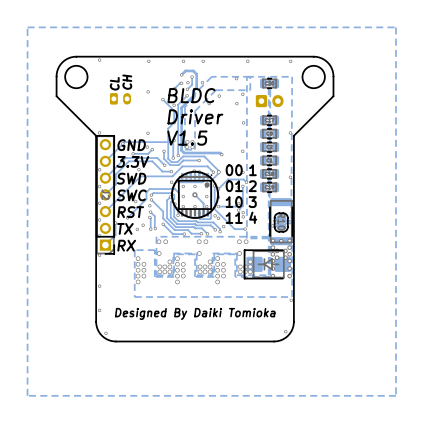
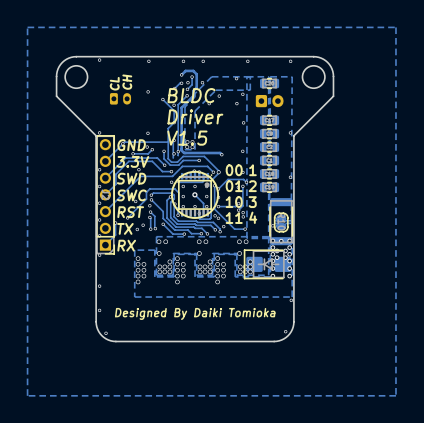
via: none -> (178, 151)
via: none -> (174, 153)
via: (178, 155) -> none
via: (173, 158) -> none

